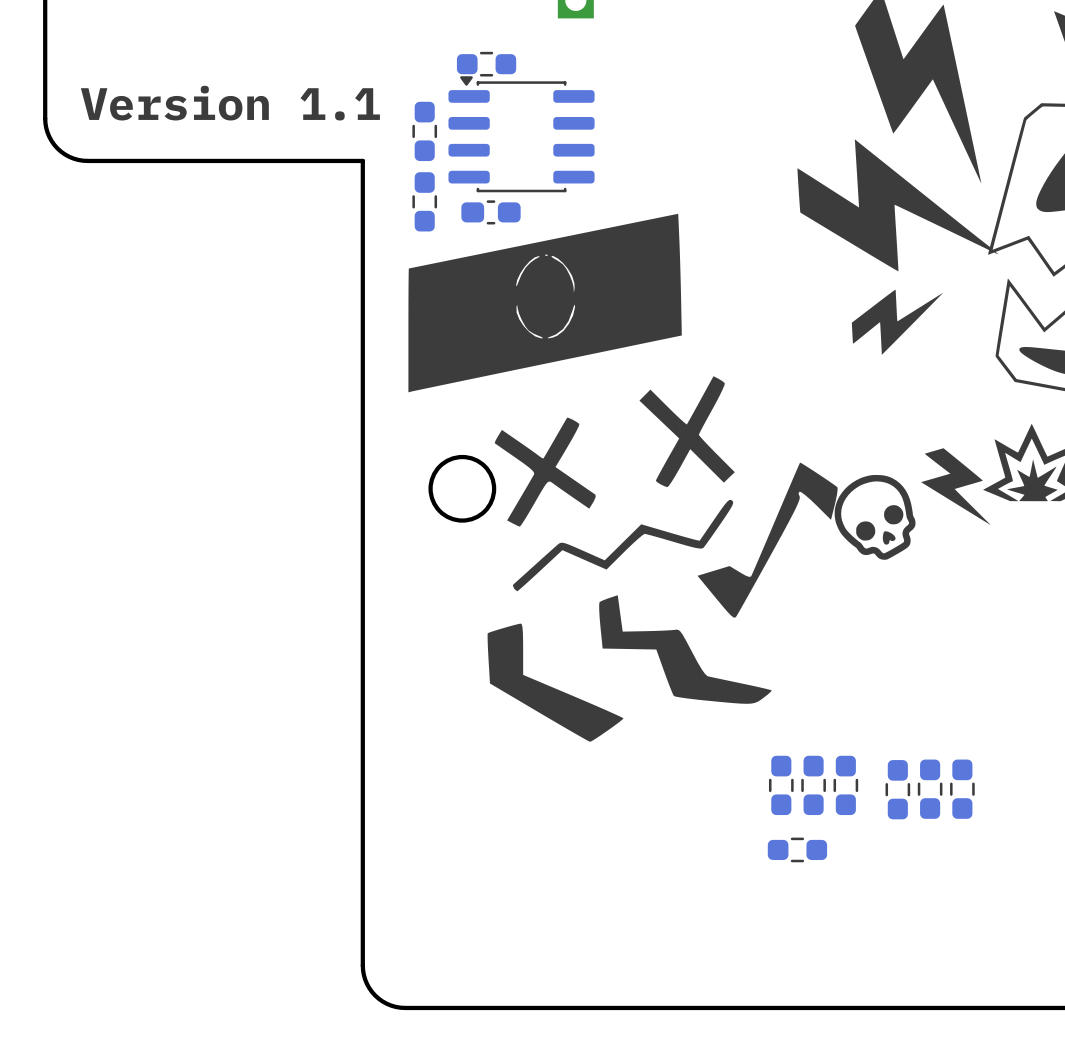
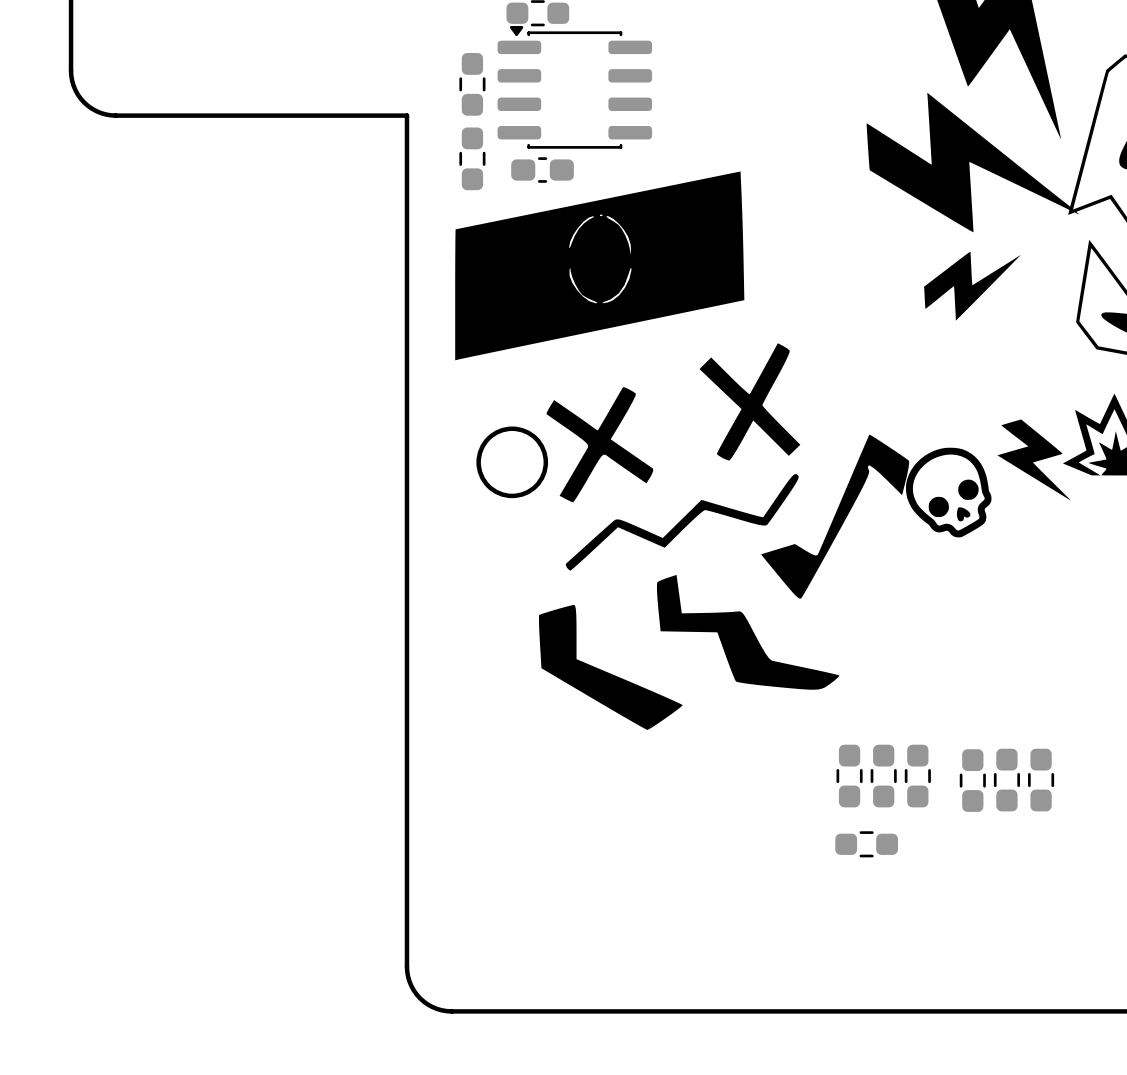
text: Version 1.1 (230, 103) -> none

